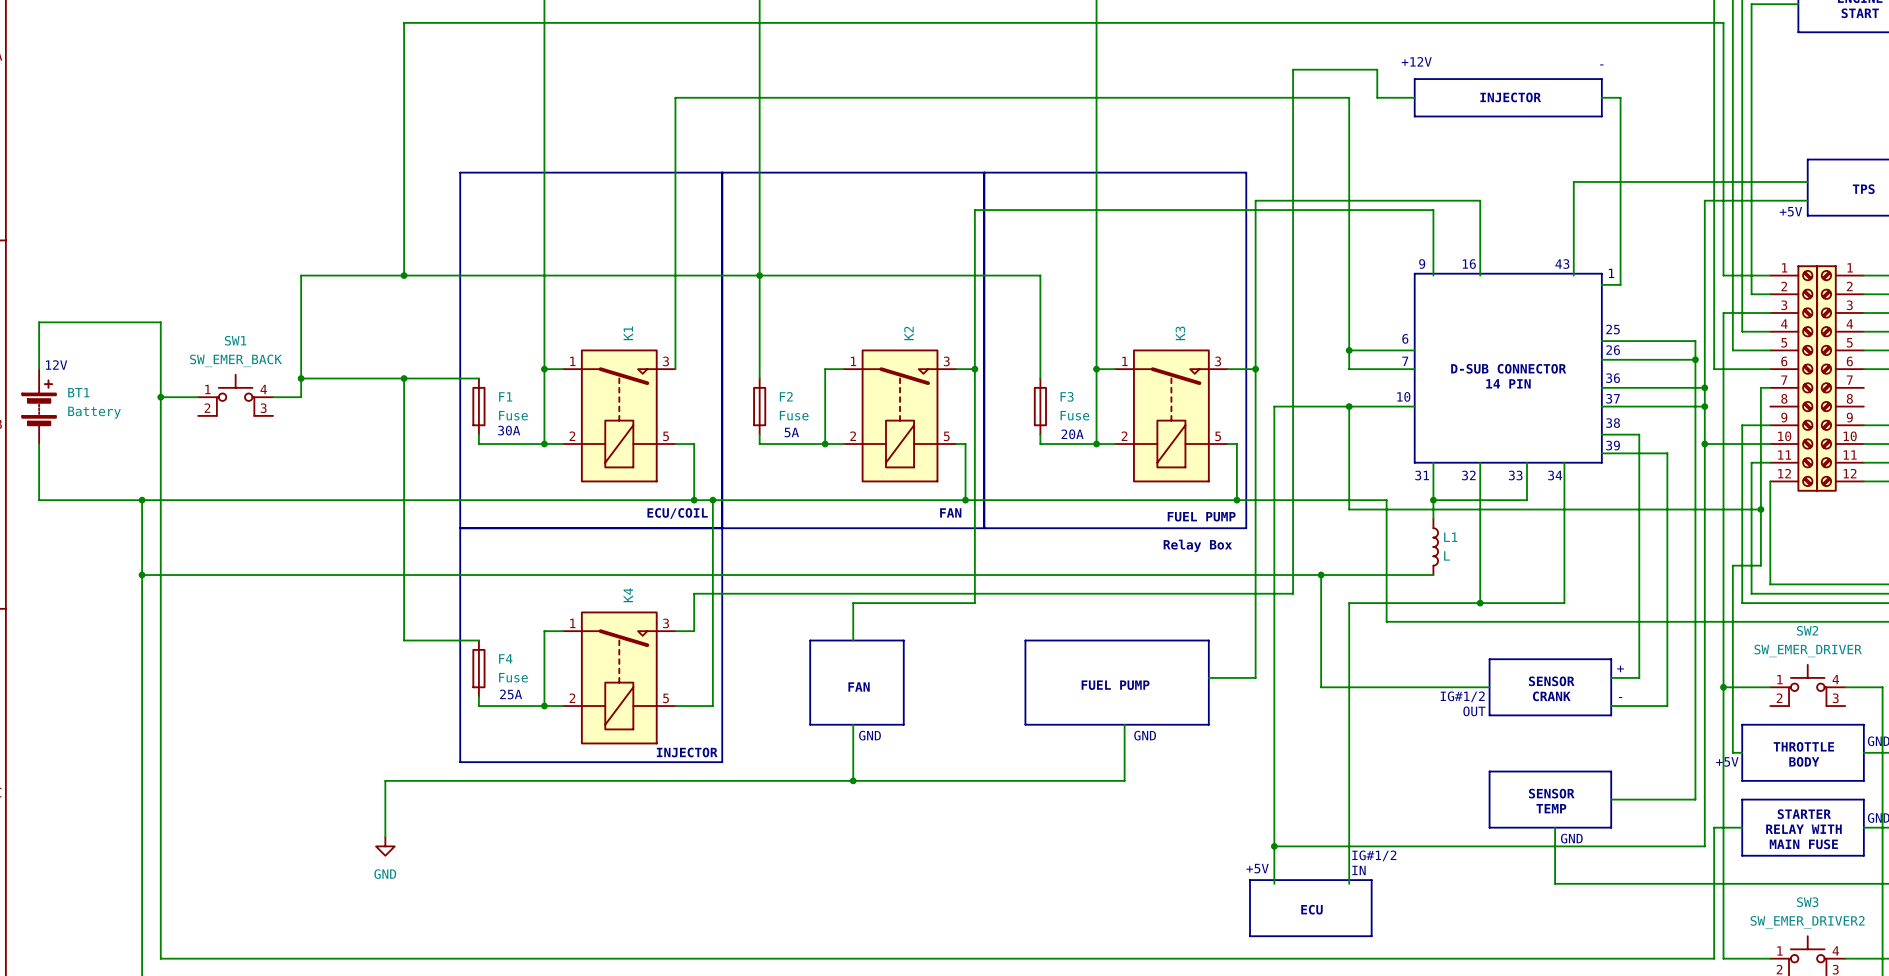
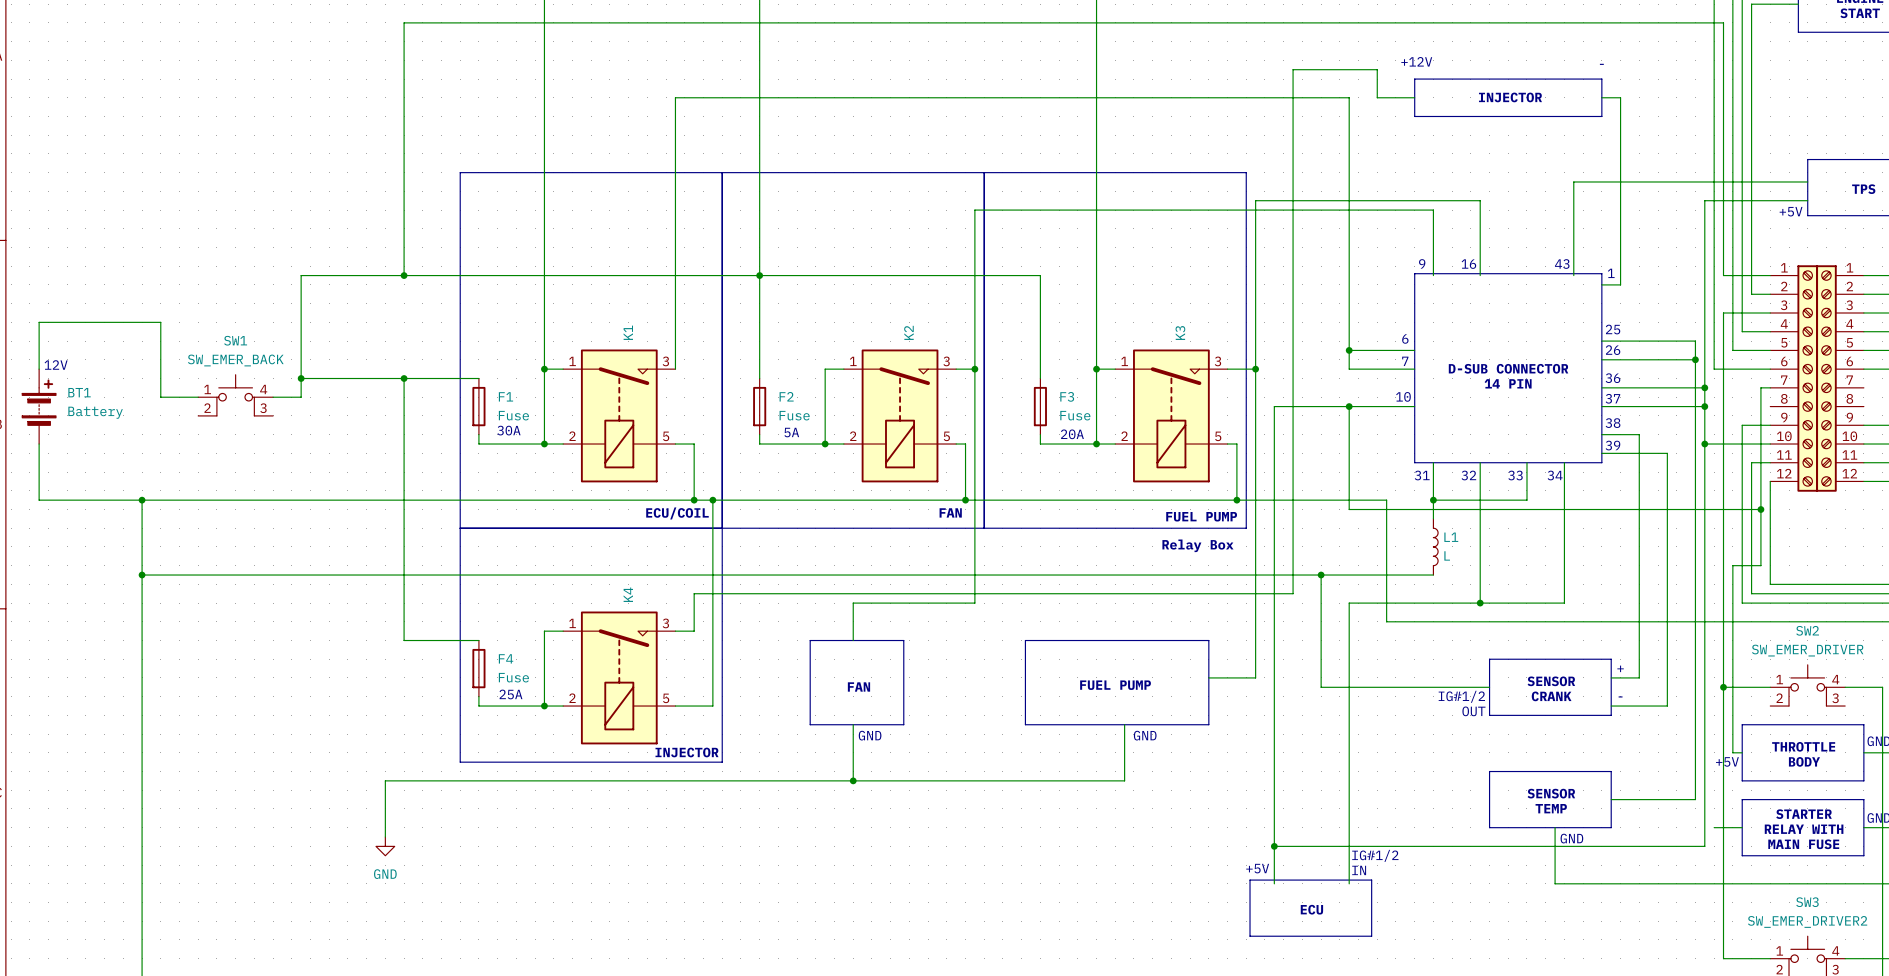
wire: (160, 397) (160, 958) (1714, 958) (1714, 827) -> none
junction: (160, 397) -> none

